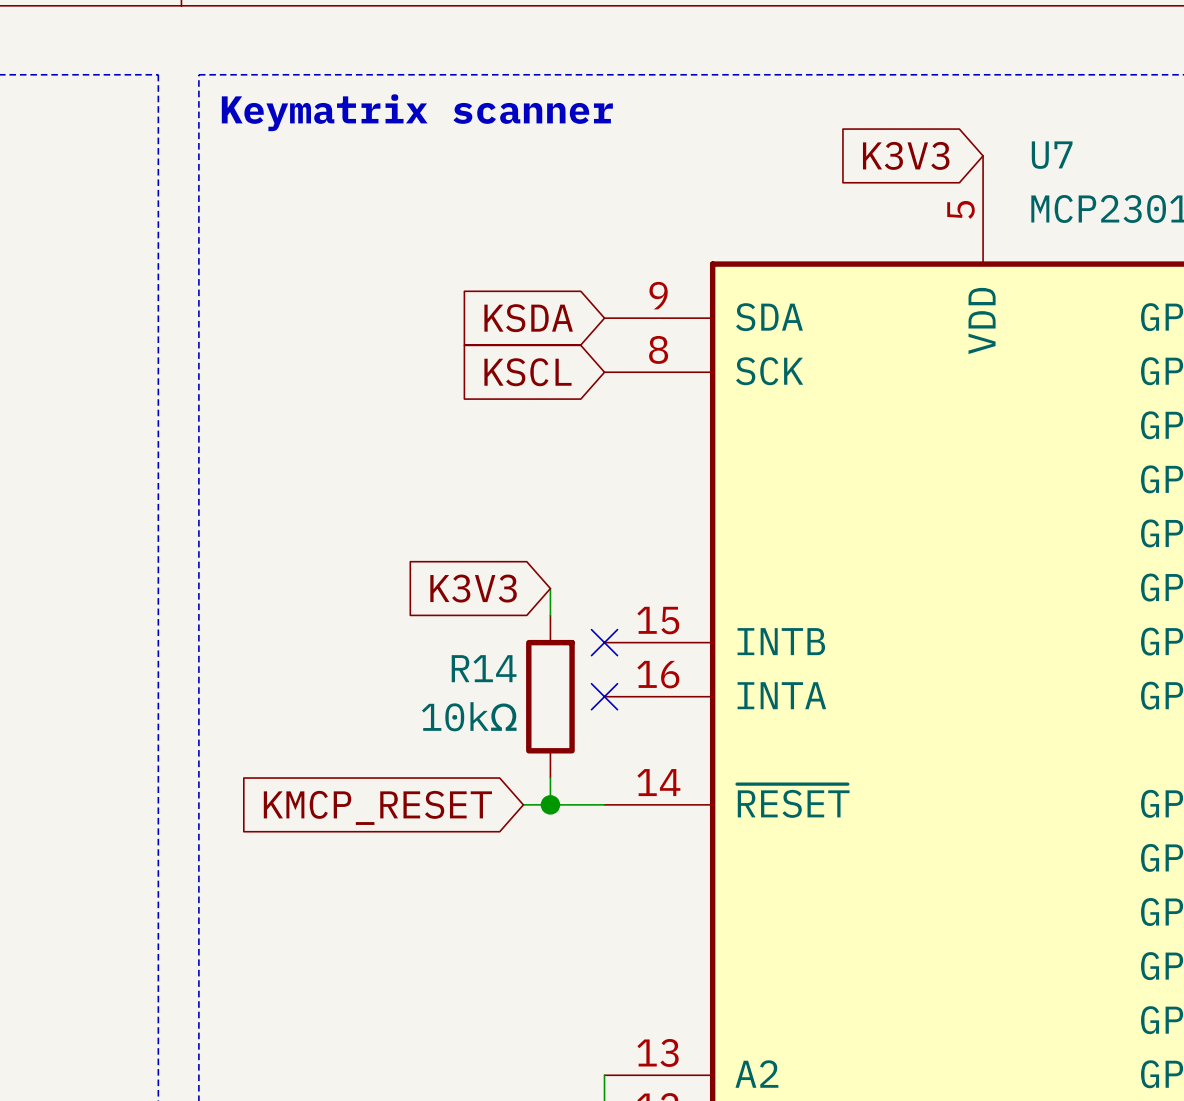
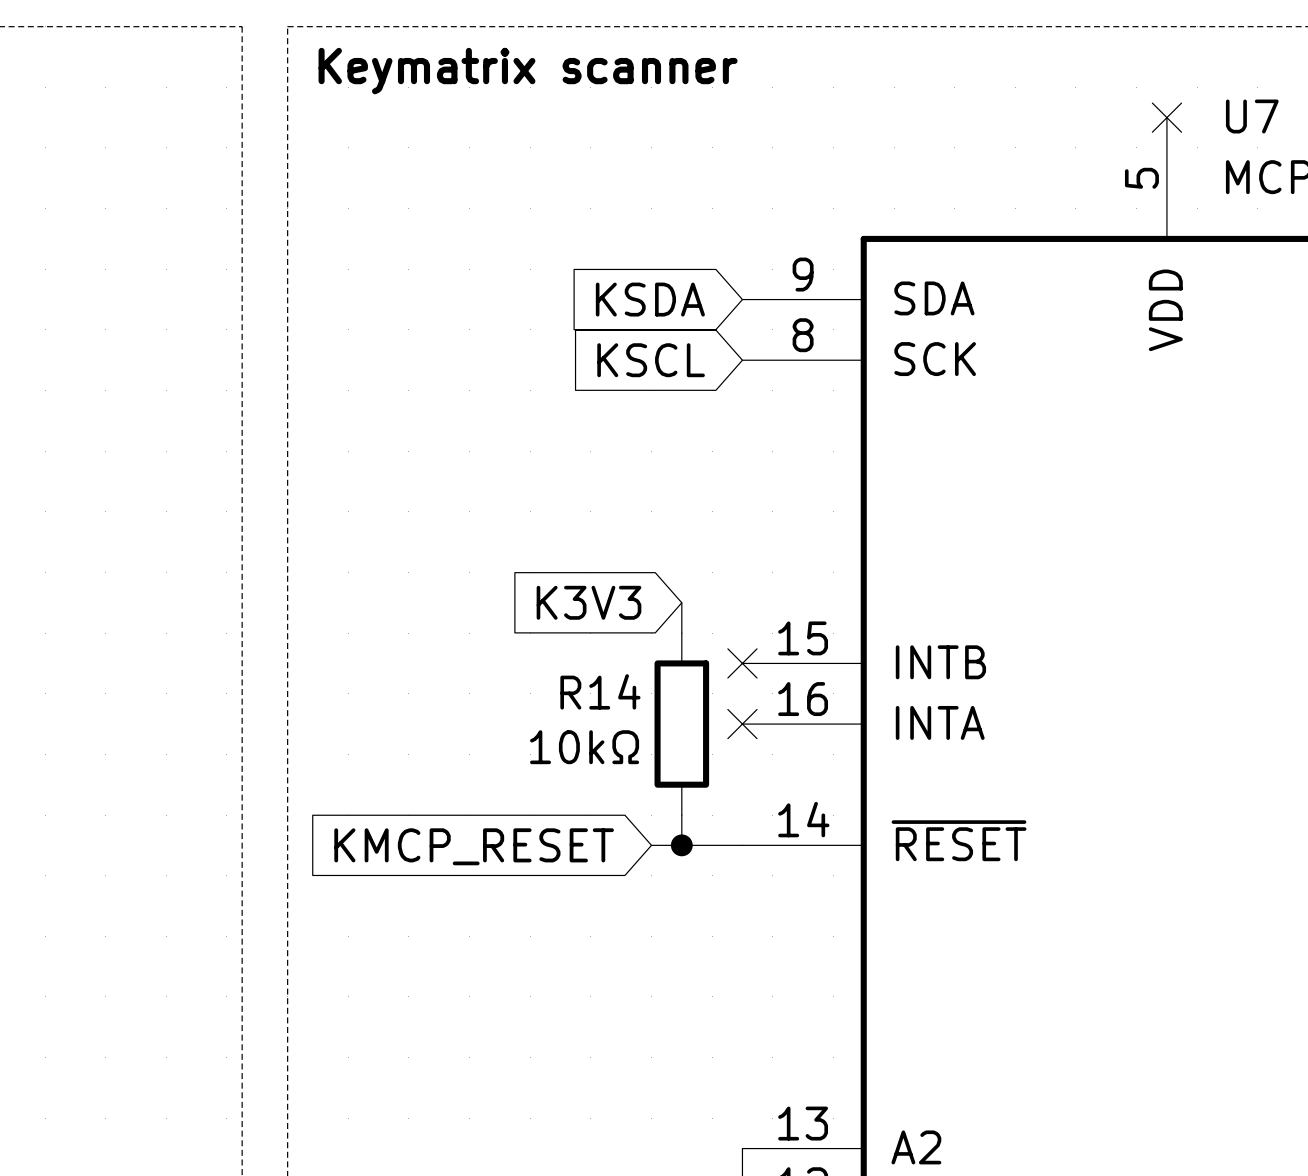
global label: K3V3 (906, 155) -> none
no-connect mark: none -> (1166, 117)

